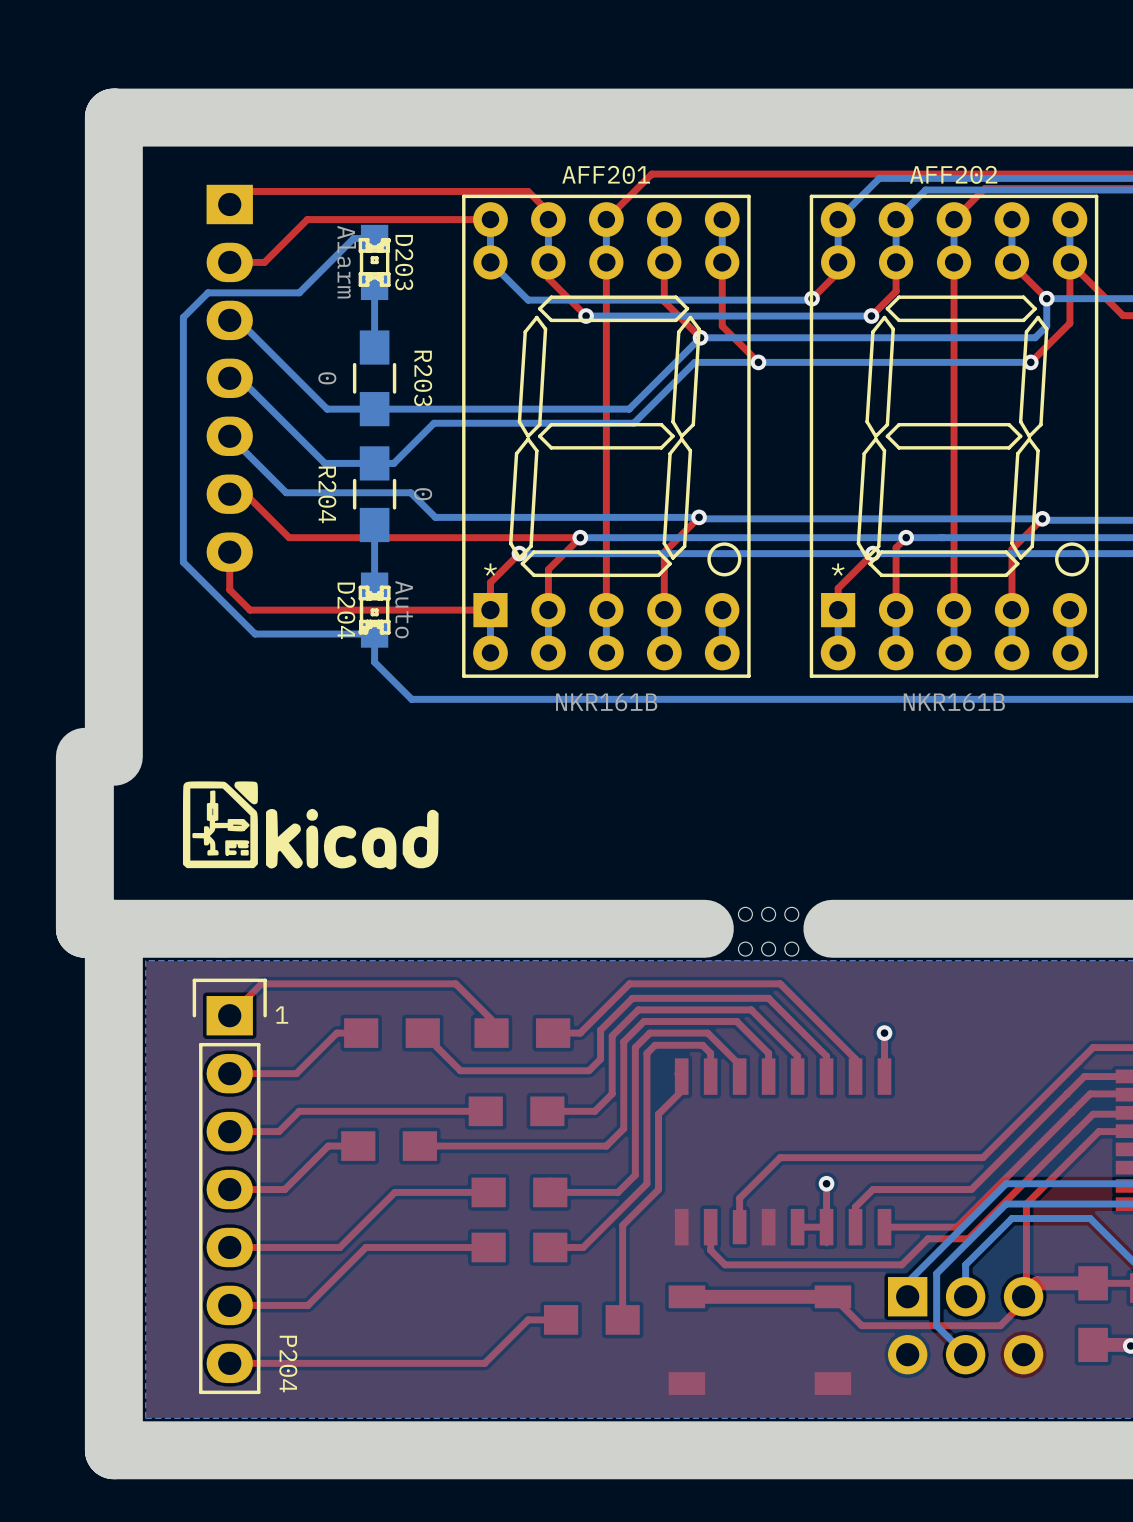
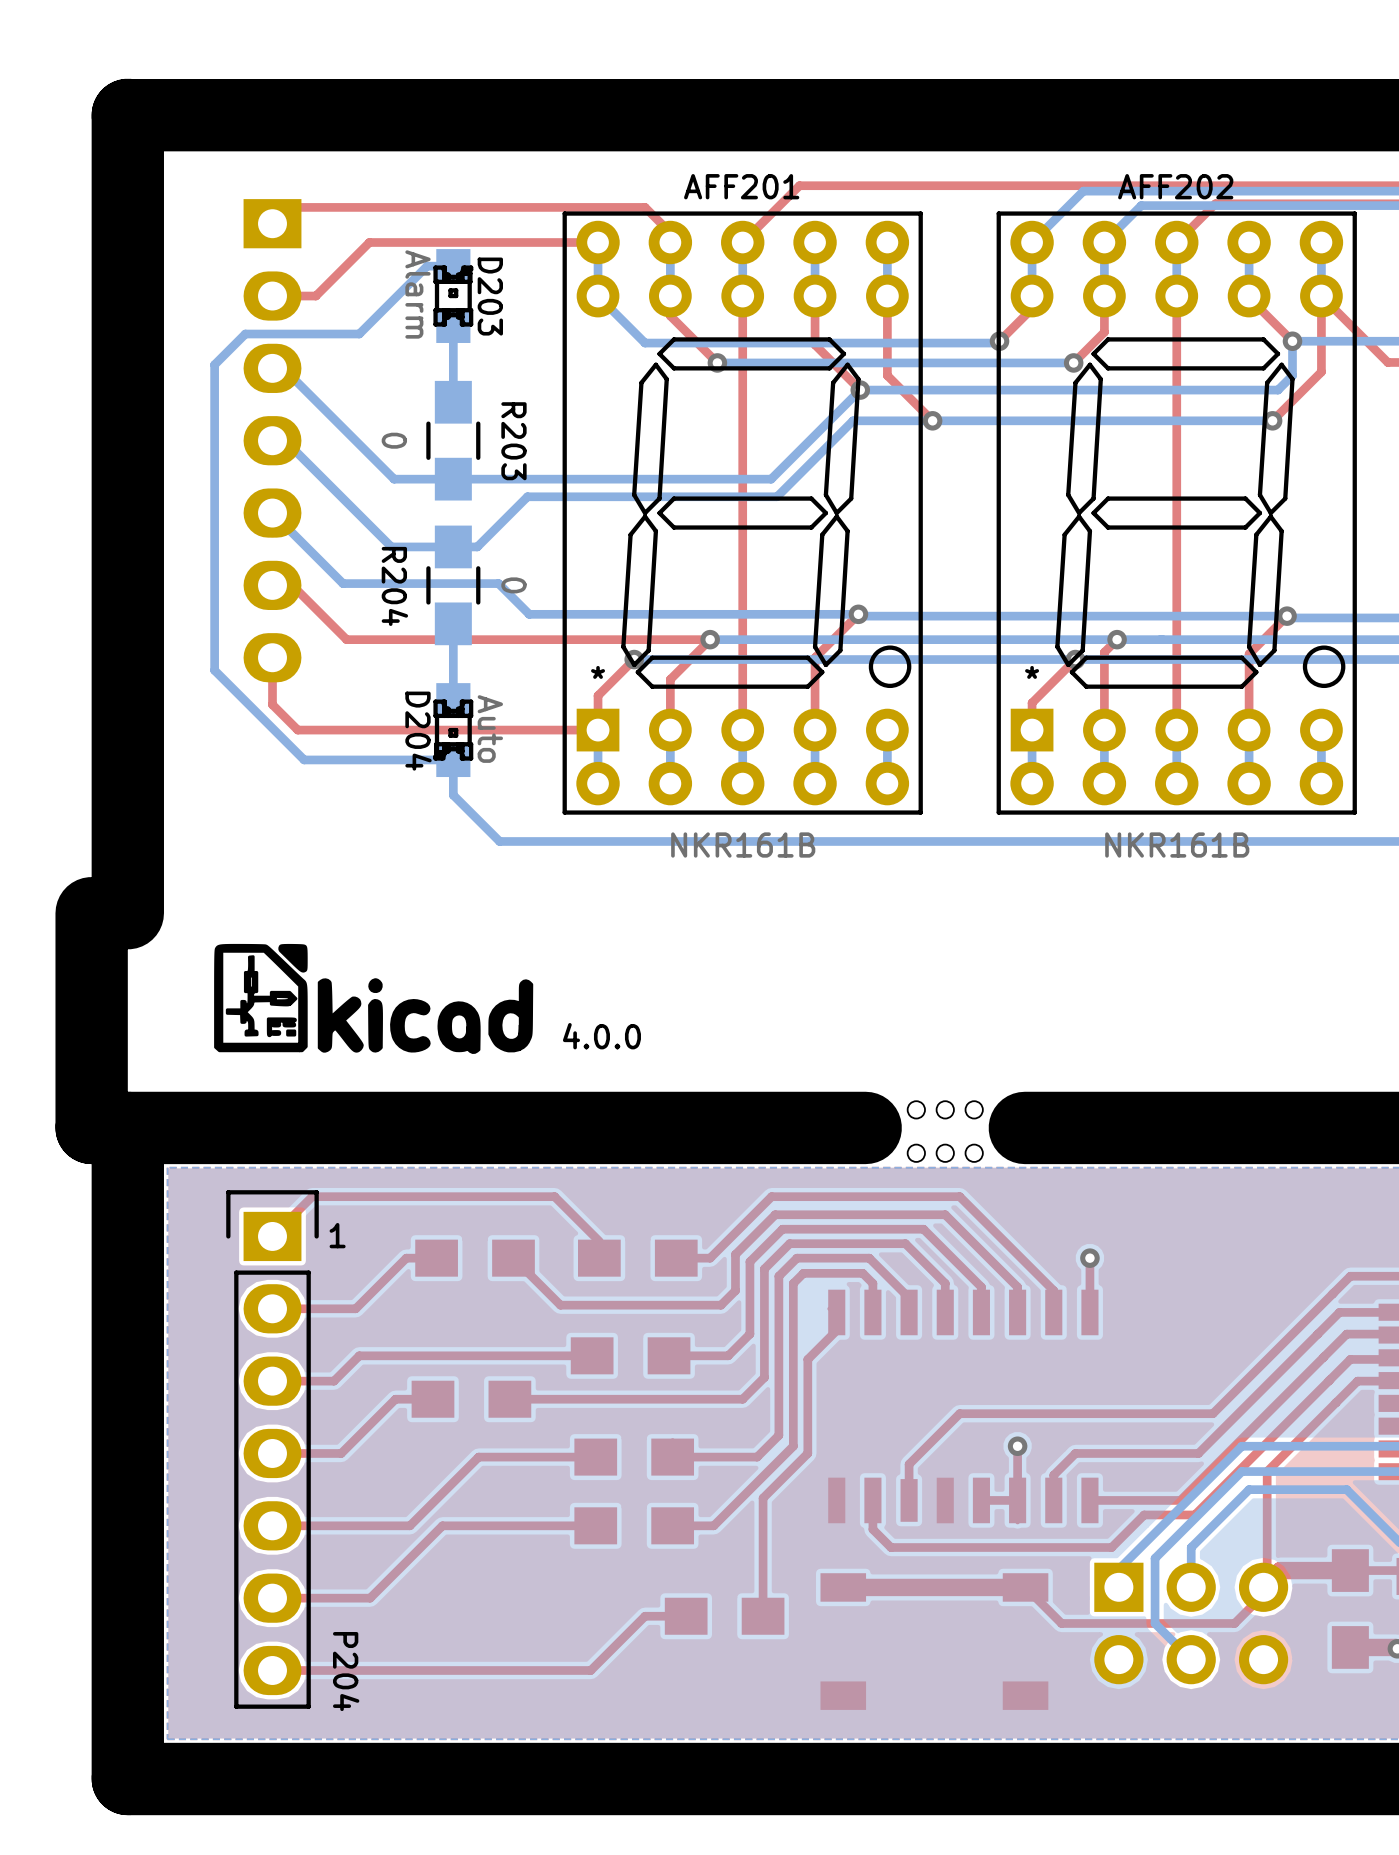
text: none -> 4.0.0 (601, 1036)

